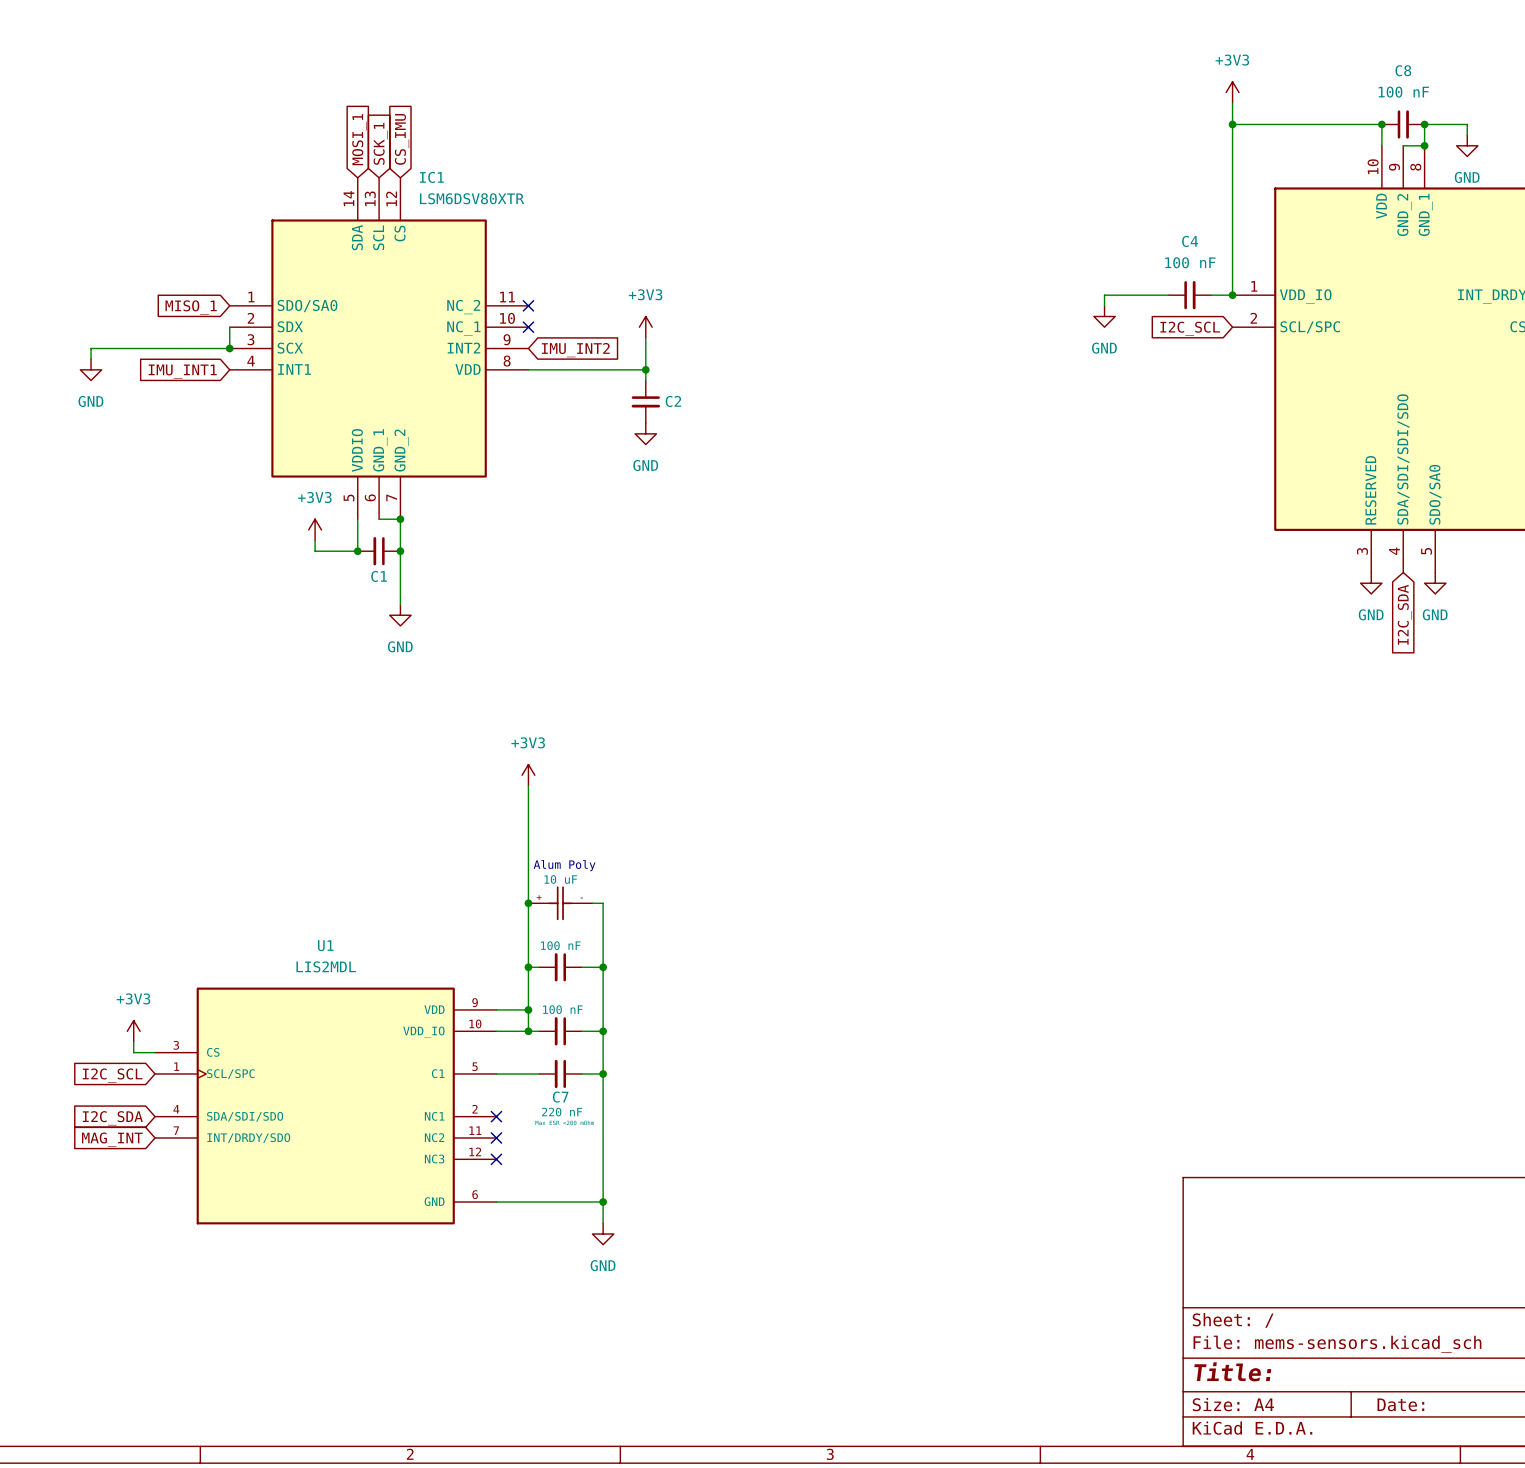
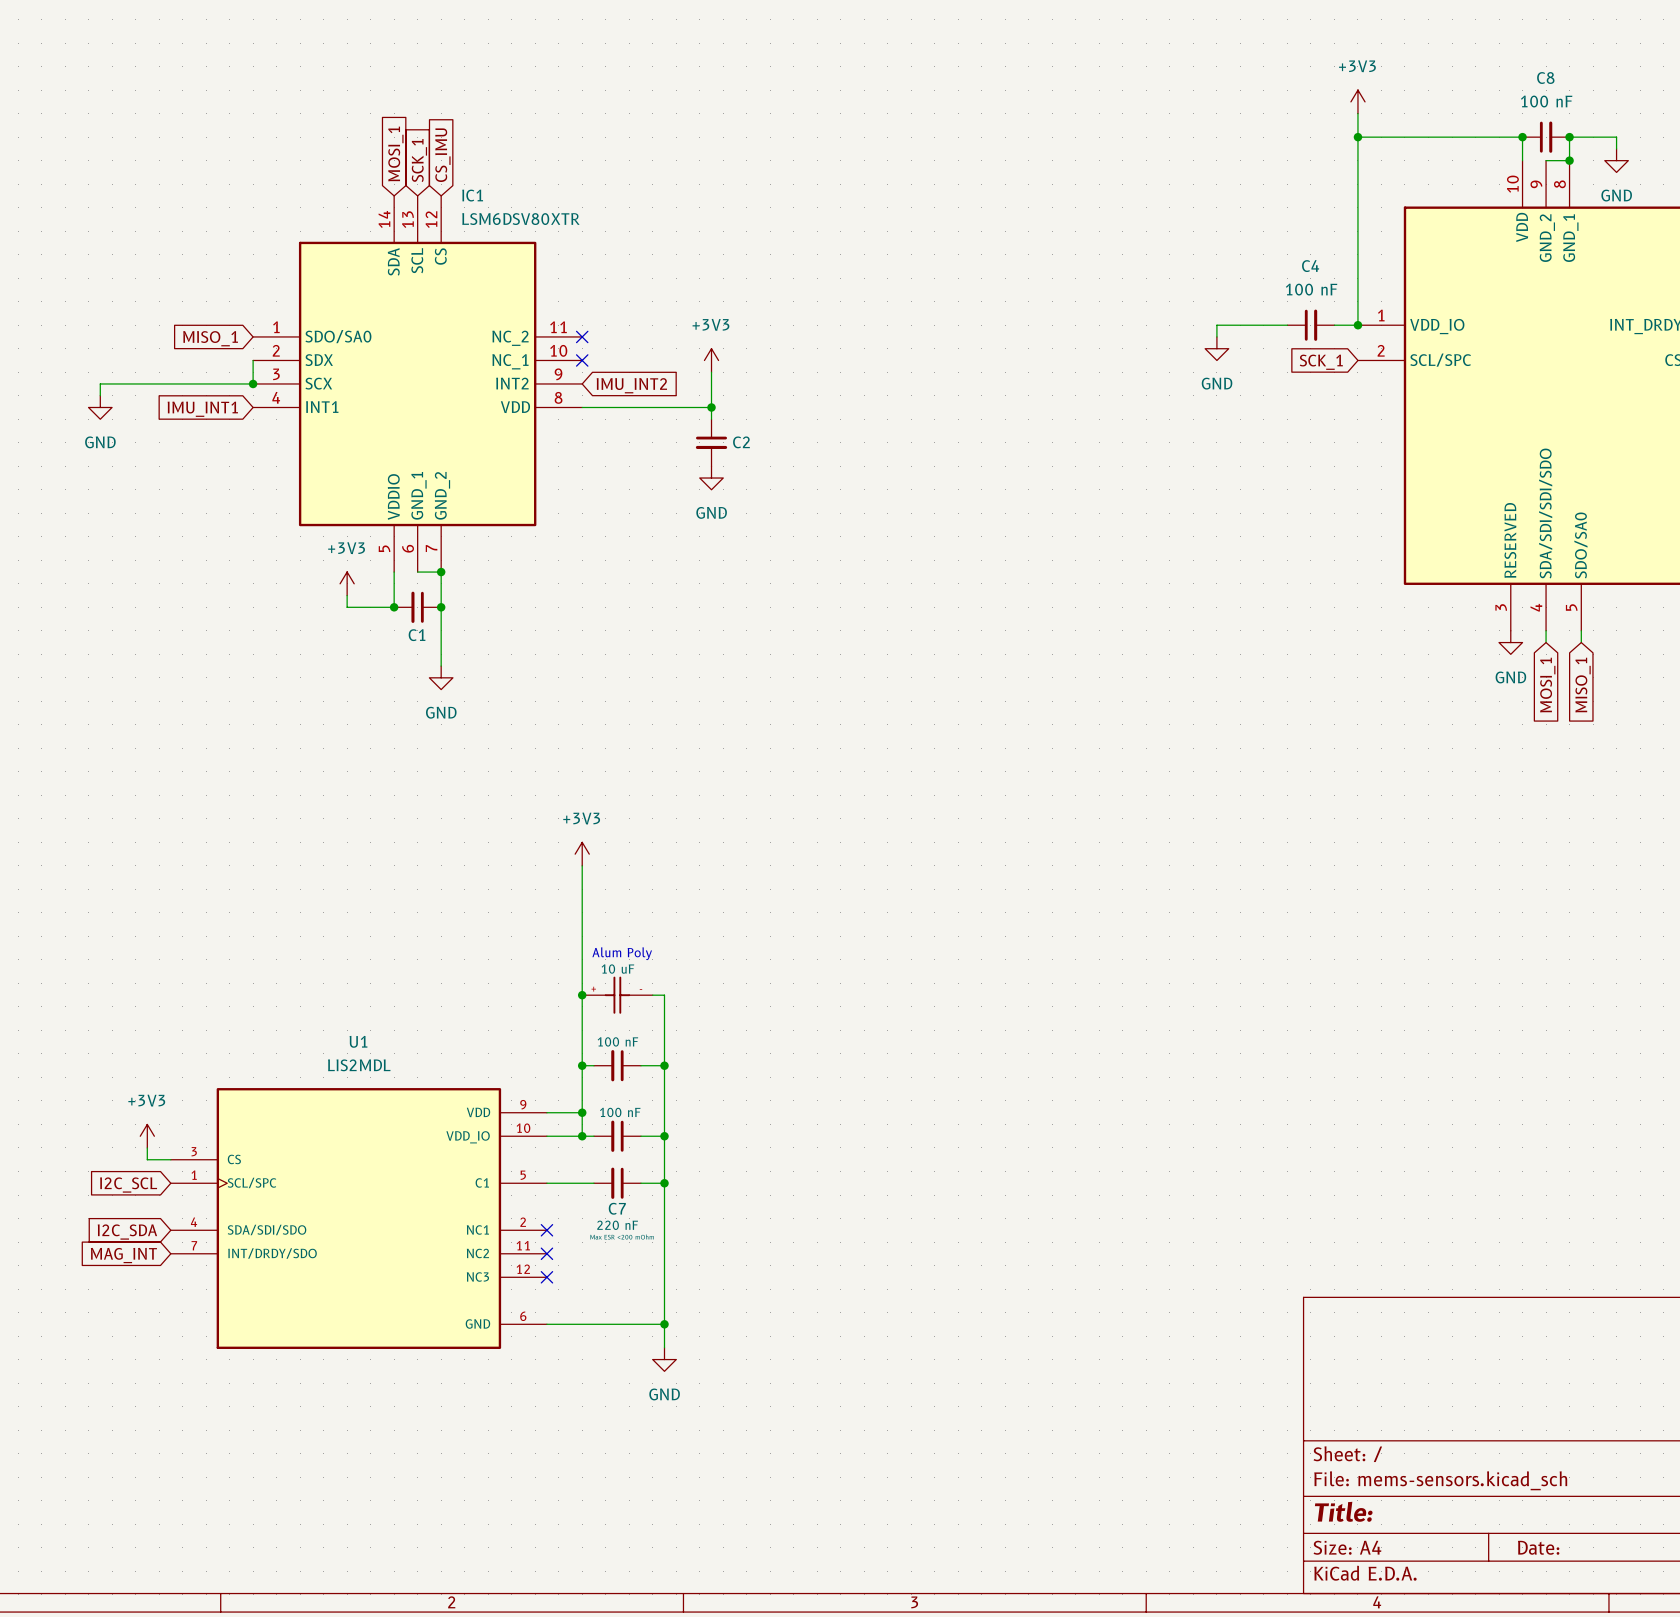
global label: I2C_SCL (1190, 328) -> SCK_1 (1321, 362)
wire: none -> (1546, 630) (1546, 642)
power symbol: GND (1435, 583) -> none
global label: I2C_SDA (1404, 614) -> none
global label: none -> MOSI_1 (1547, 685)
global label: none -> MISO_1 (1583, 685)

